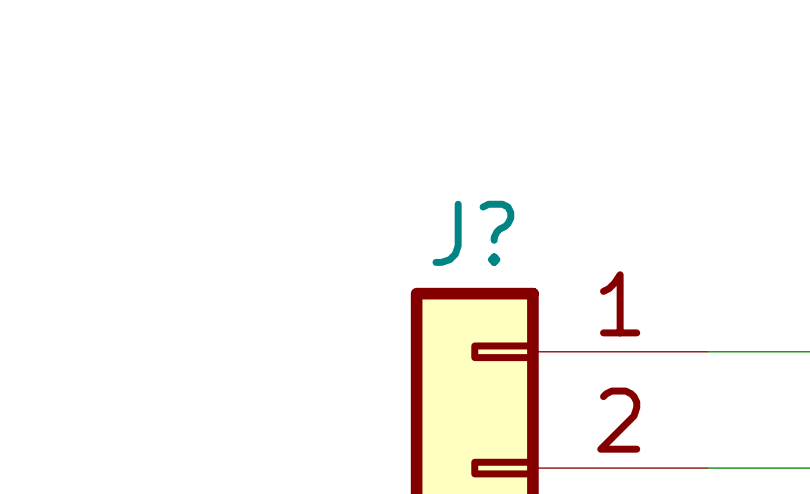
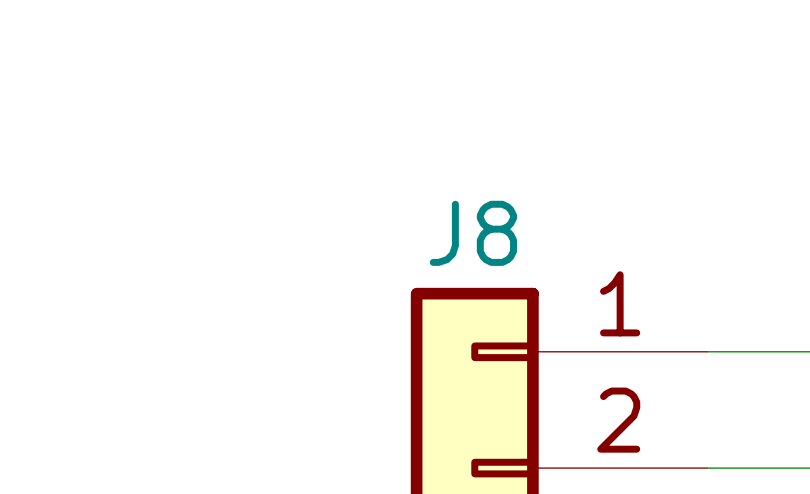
J? name: J? (473, 233) -> J8 (473, 233)

